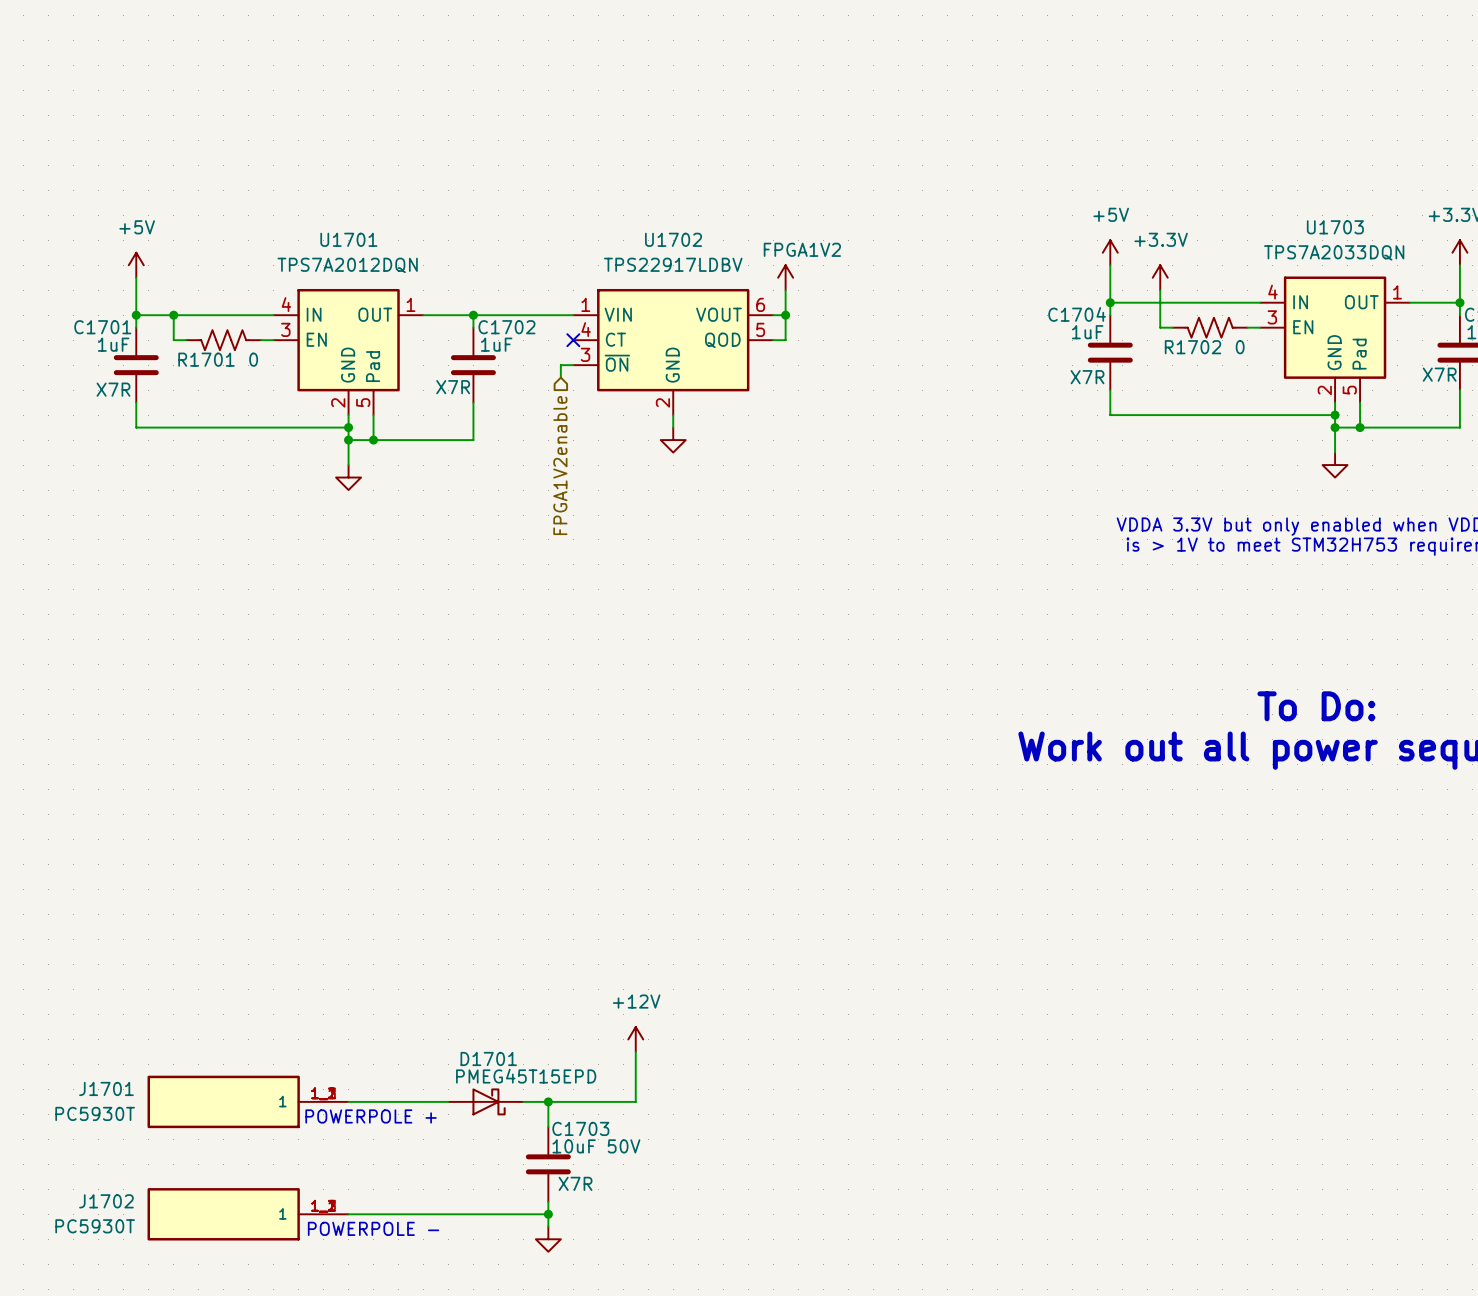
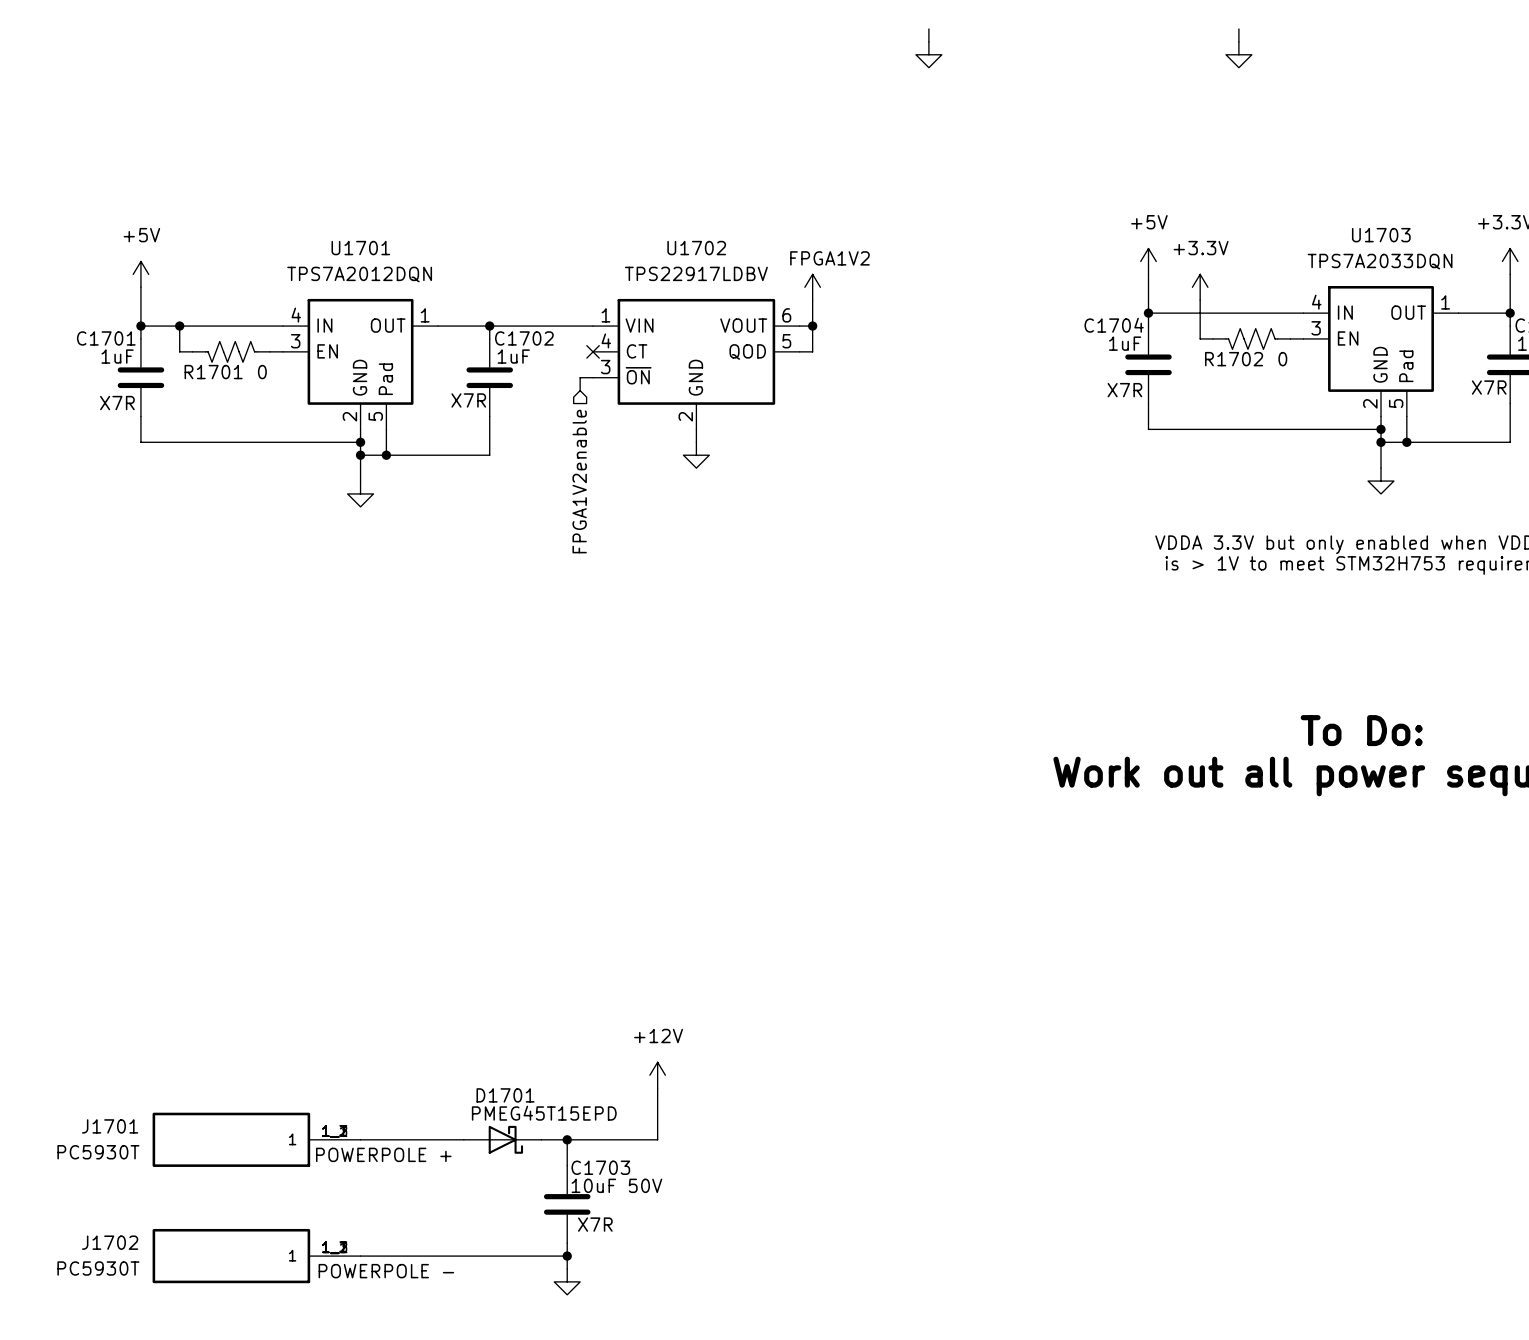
wire: none -> (928, 28) (928, 41)
wire: none -> (1238, 28) (1238, 41)
power symbol: none -> (928, 54)
power symbol: none -> (1238, 54)

